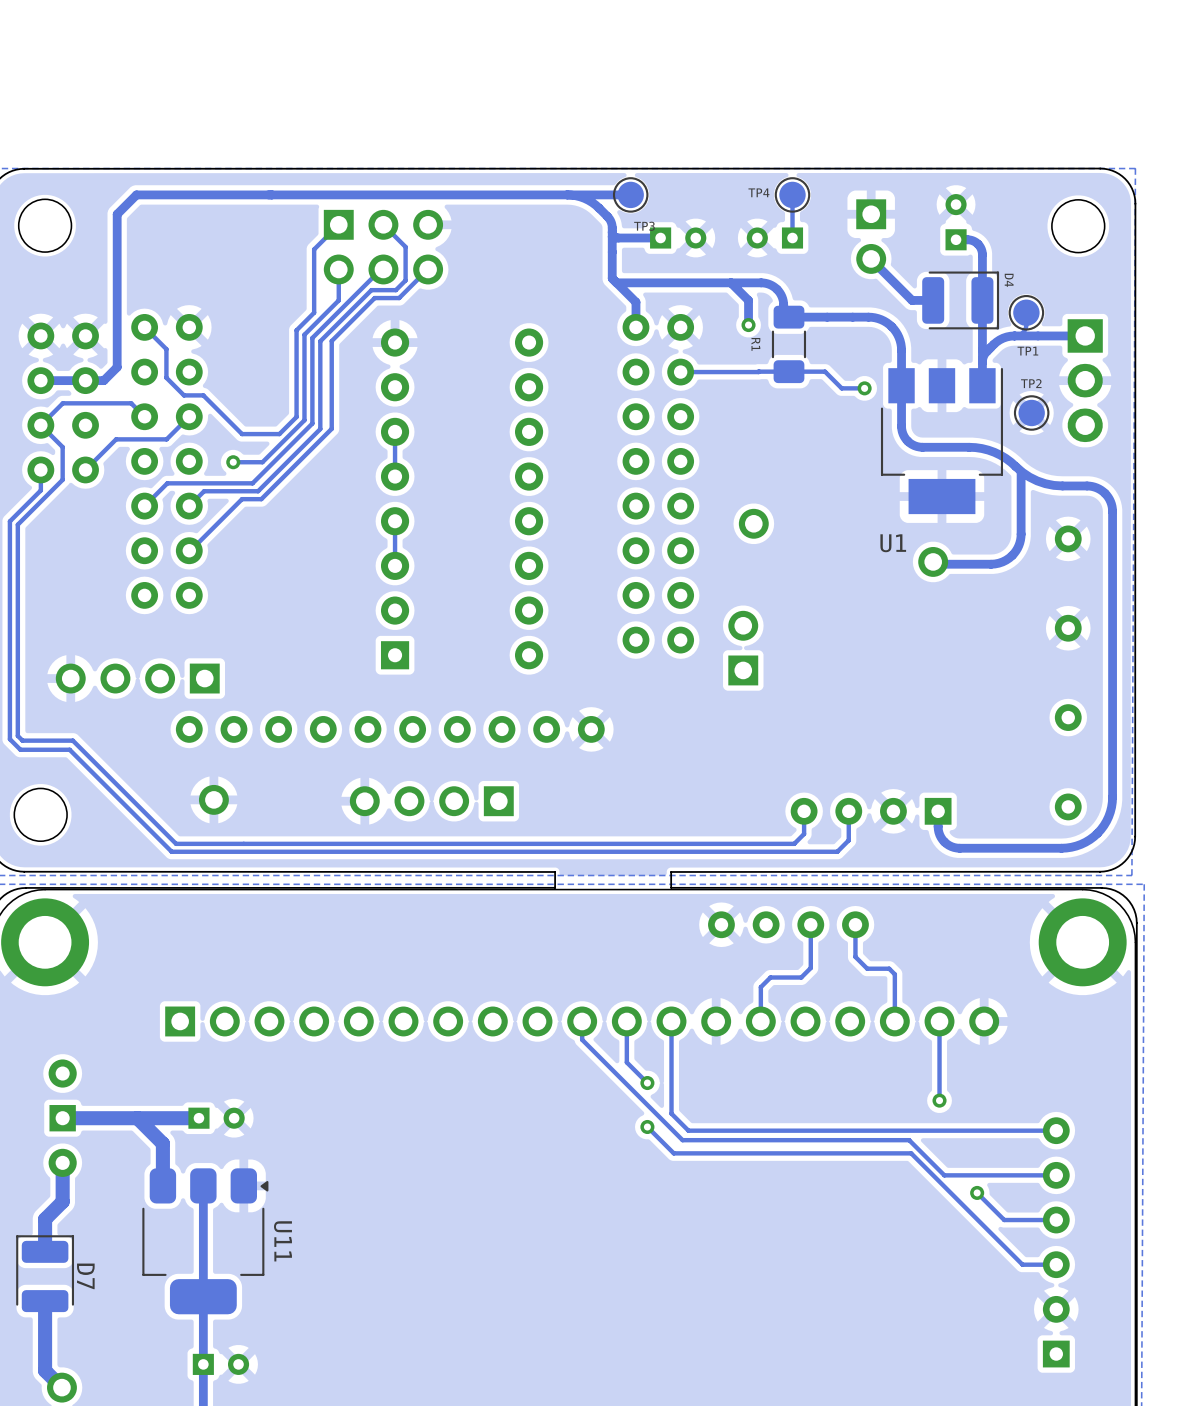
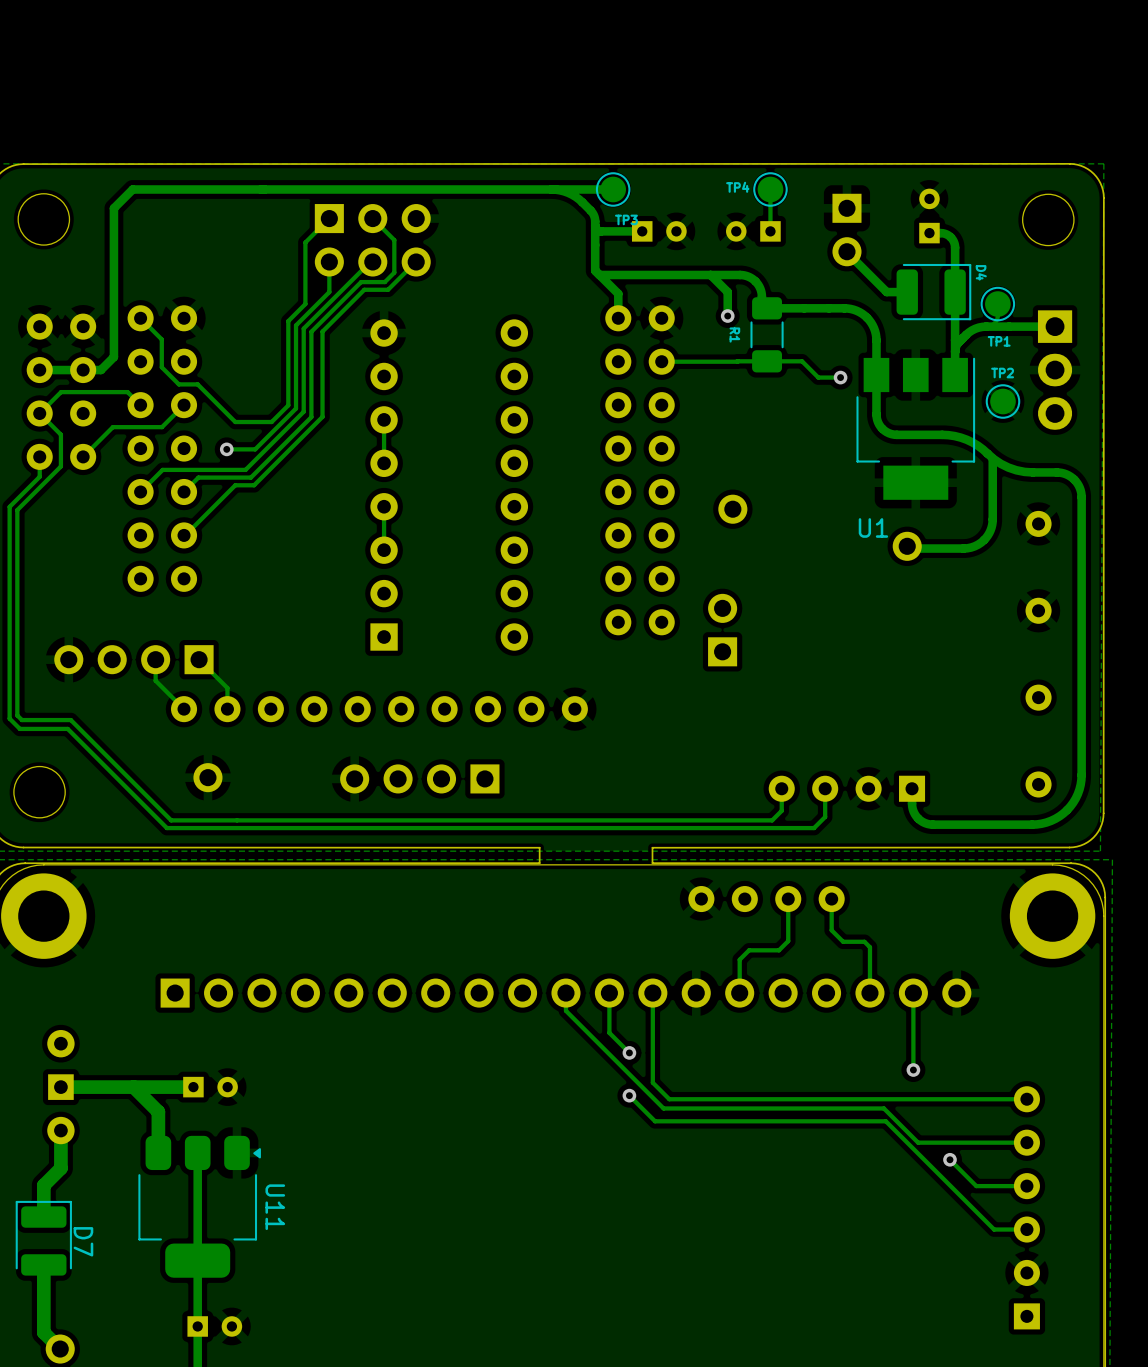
track: none -> (155, 659) (155, 680) (184, 709)
track: none -> (199, 659) (227, 688) (227, 709)

